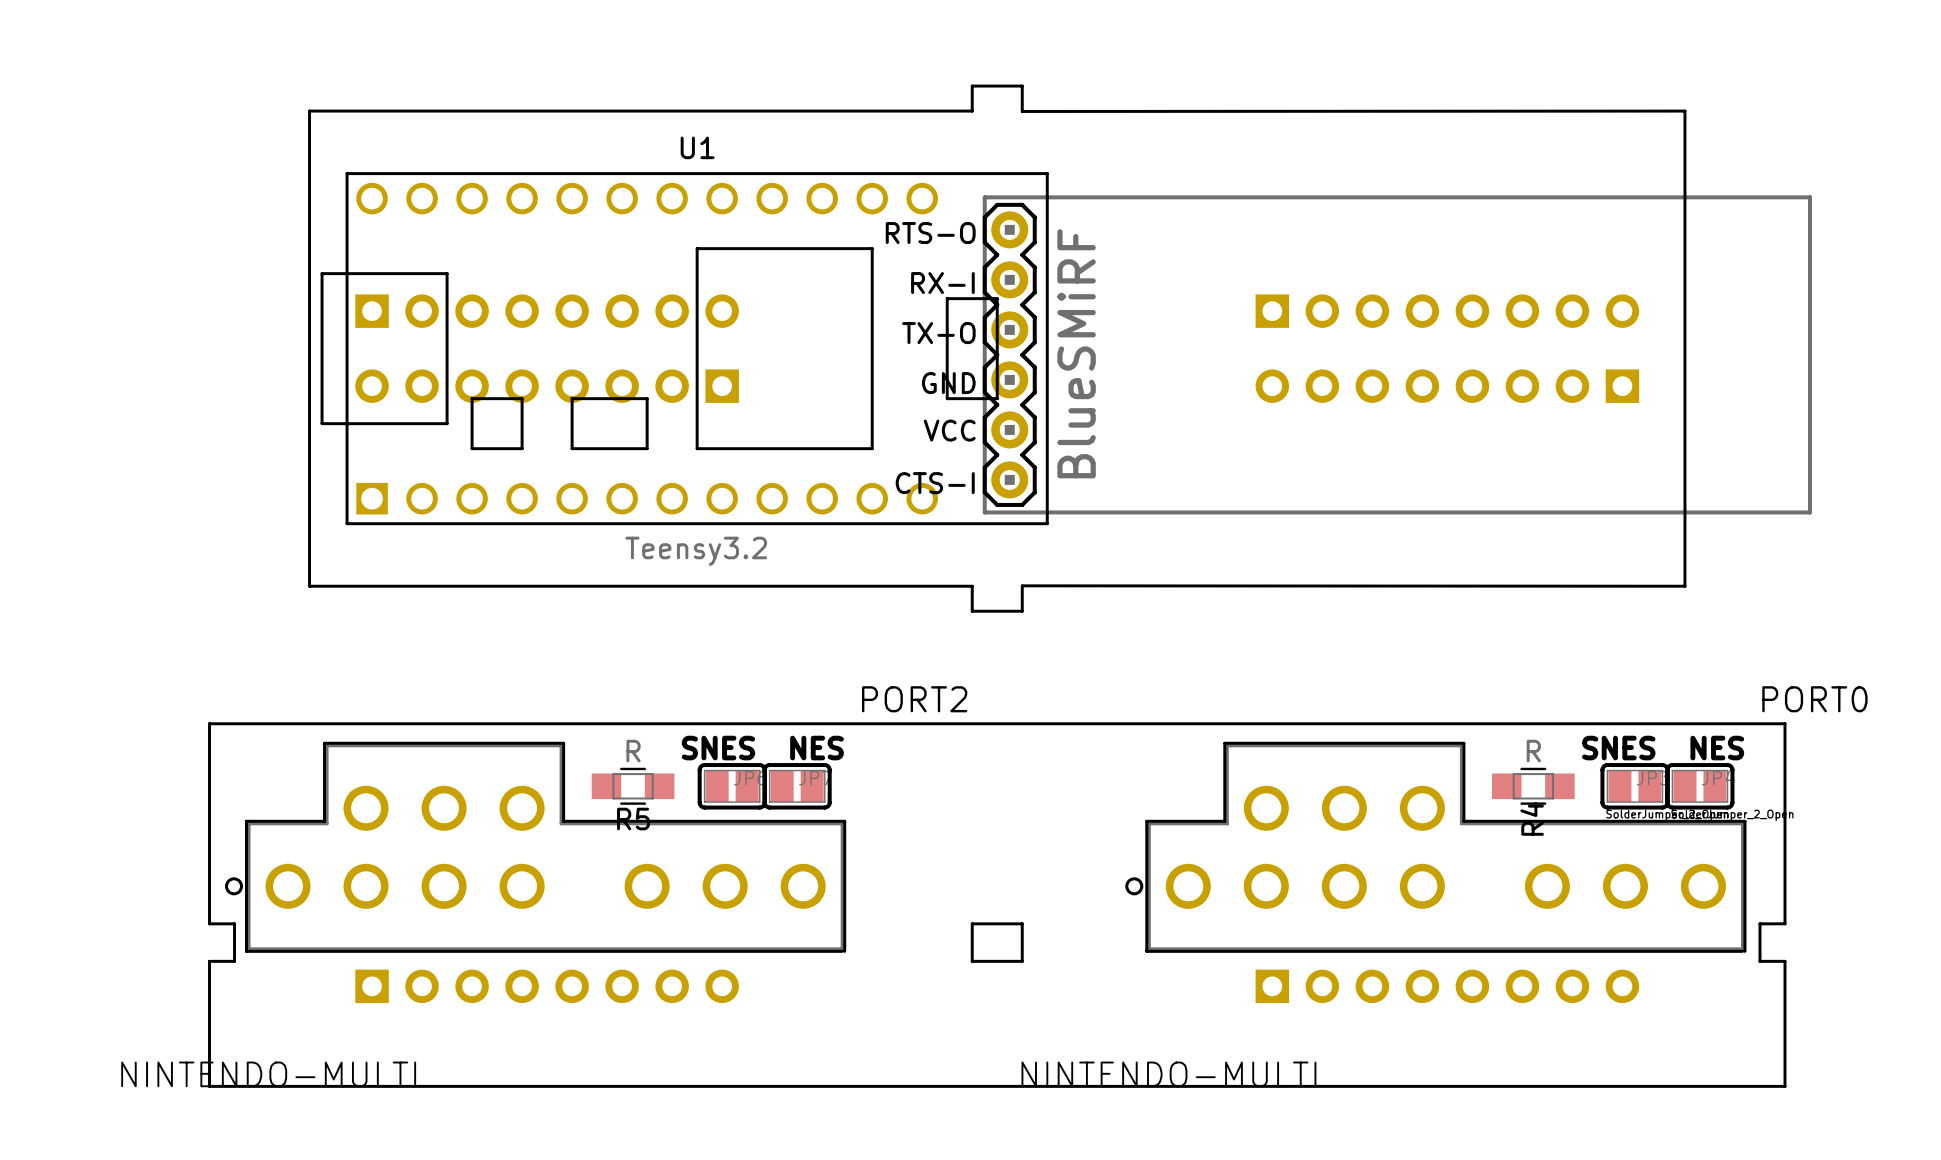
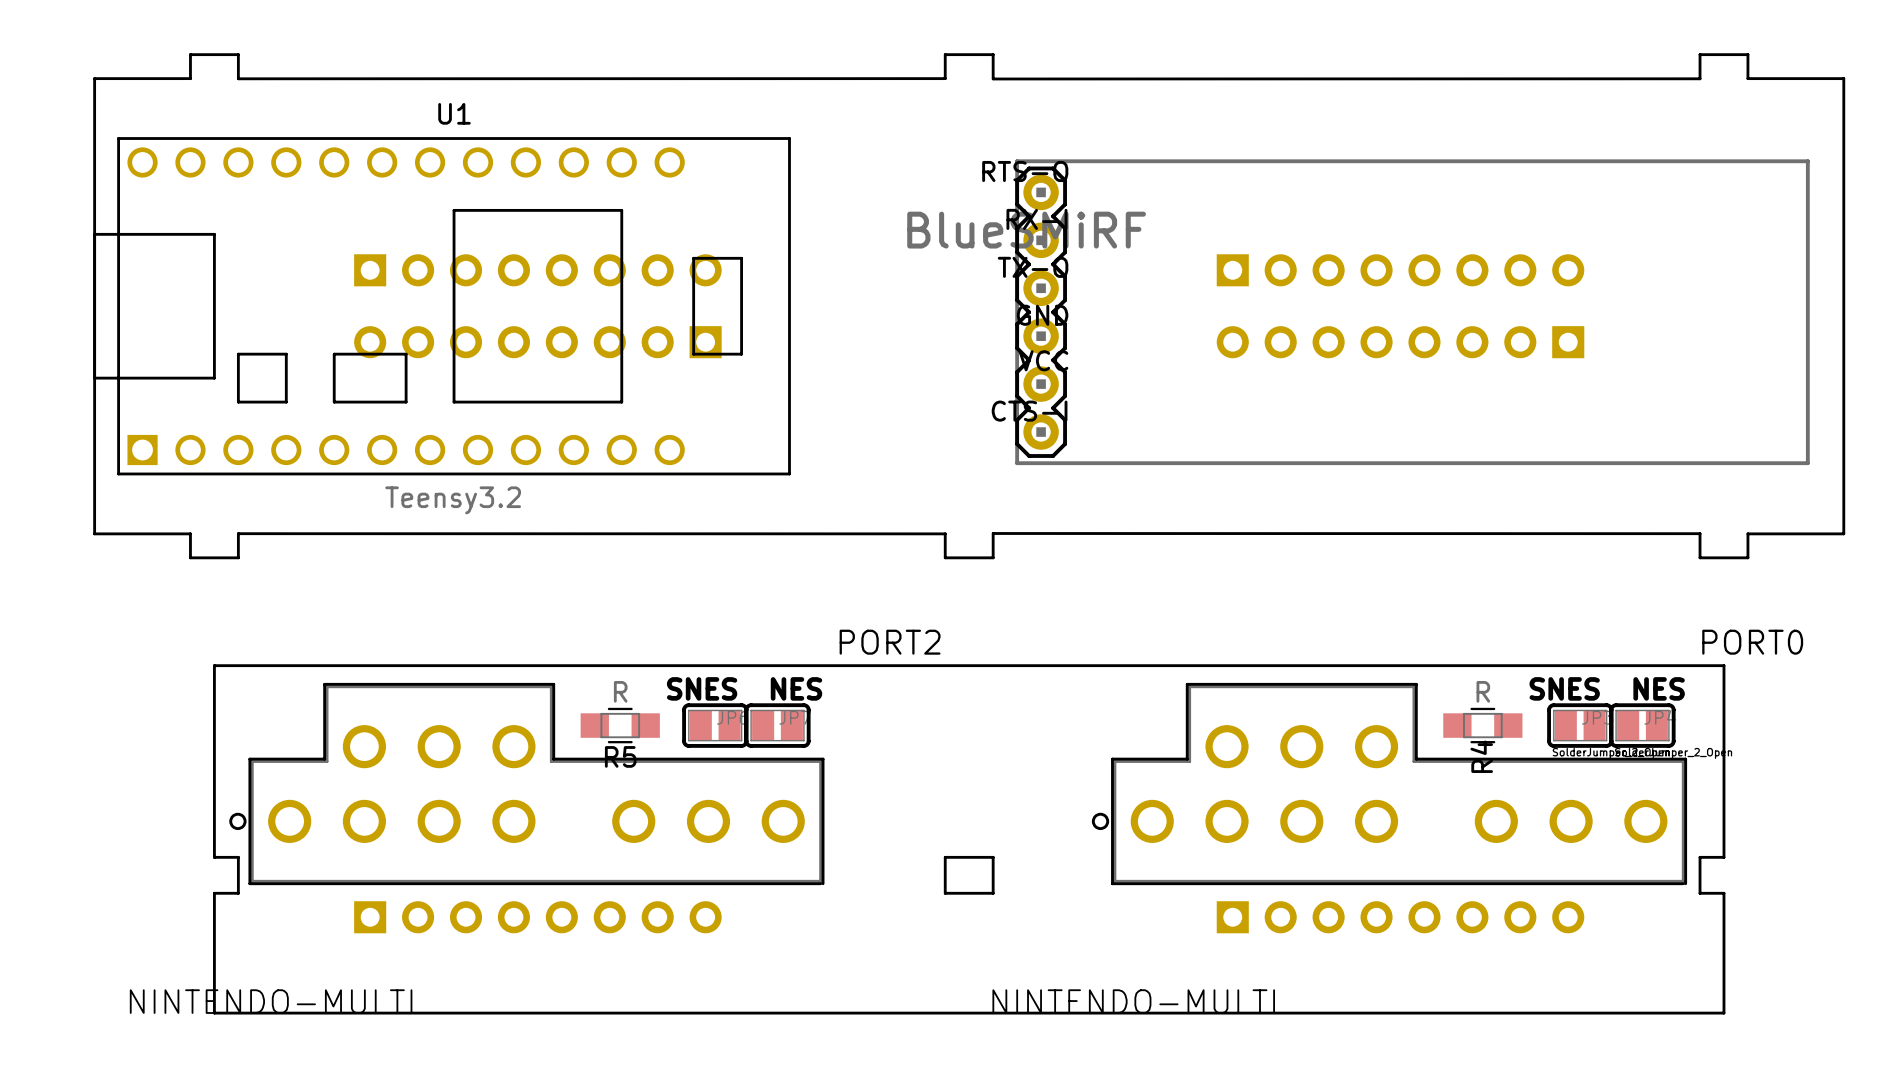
board edge: (972, 111) (309, 111) (309, 586) (972, 586) -> (945, 78) (238, 78) (238, 54) (190, 54) (190, 78) (94, 78) (94, 533) (190, 533) (190, 557) (238, 557) (238, 533) (945, 533)
board edge: (1022, 111) (1684, 111) (1684, 586) (1022, 585) -> (993, 78) (1700, 78) (1700, 54) (1747, 54) (1747, 78) (1843, 78) (1843, 533) (1747, 533) (1747, 557) (1700, 557) (1700, 533) (993, 533)
U1 position: (684, 348) -> (442, 306)
part: (1397, 354) -> none
part: none -> (1412, 312)

